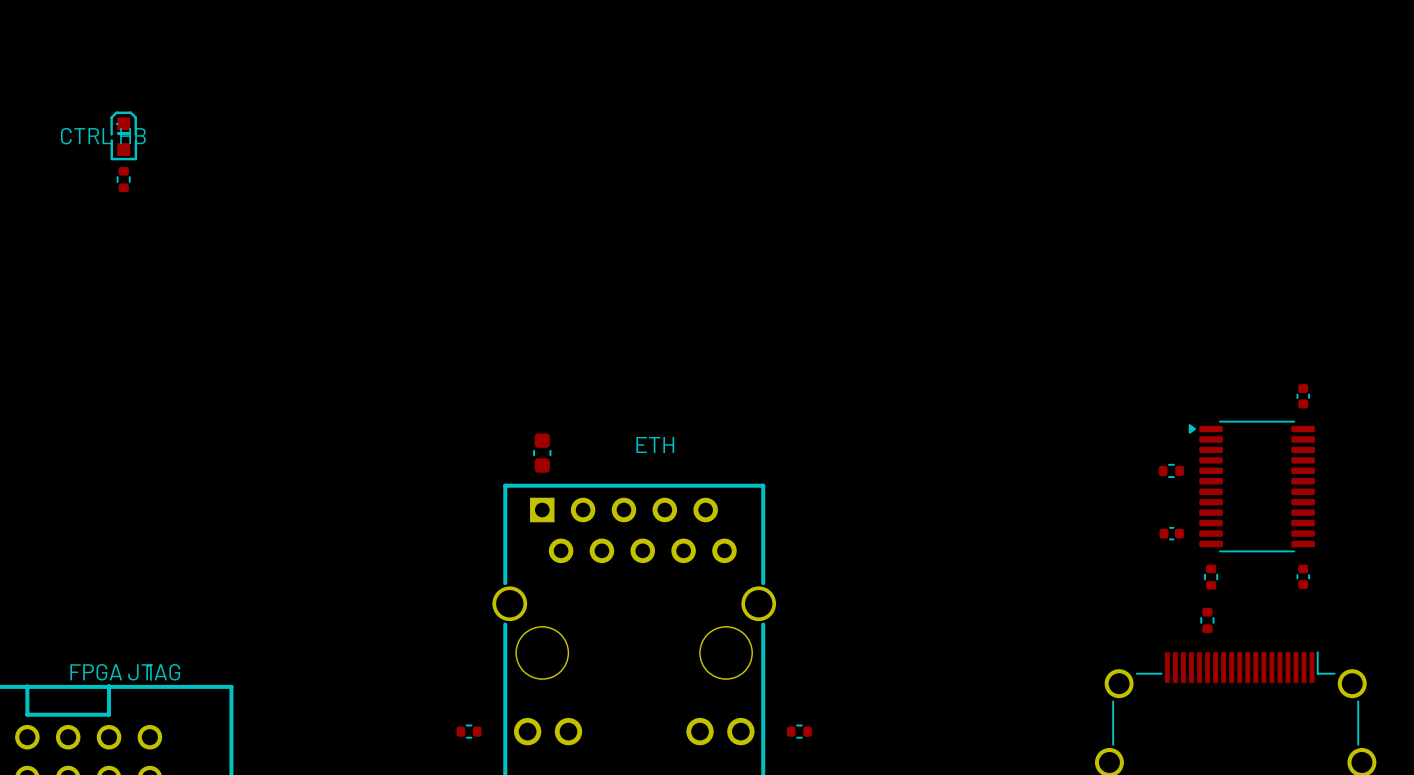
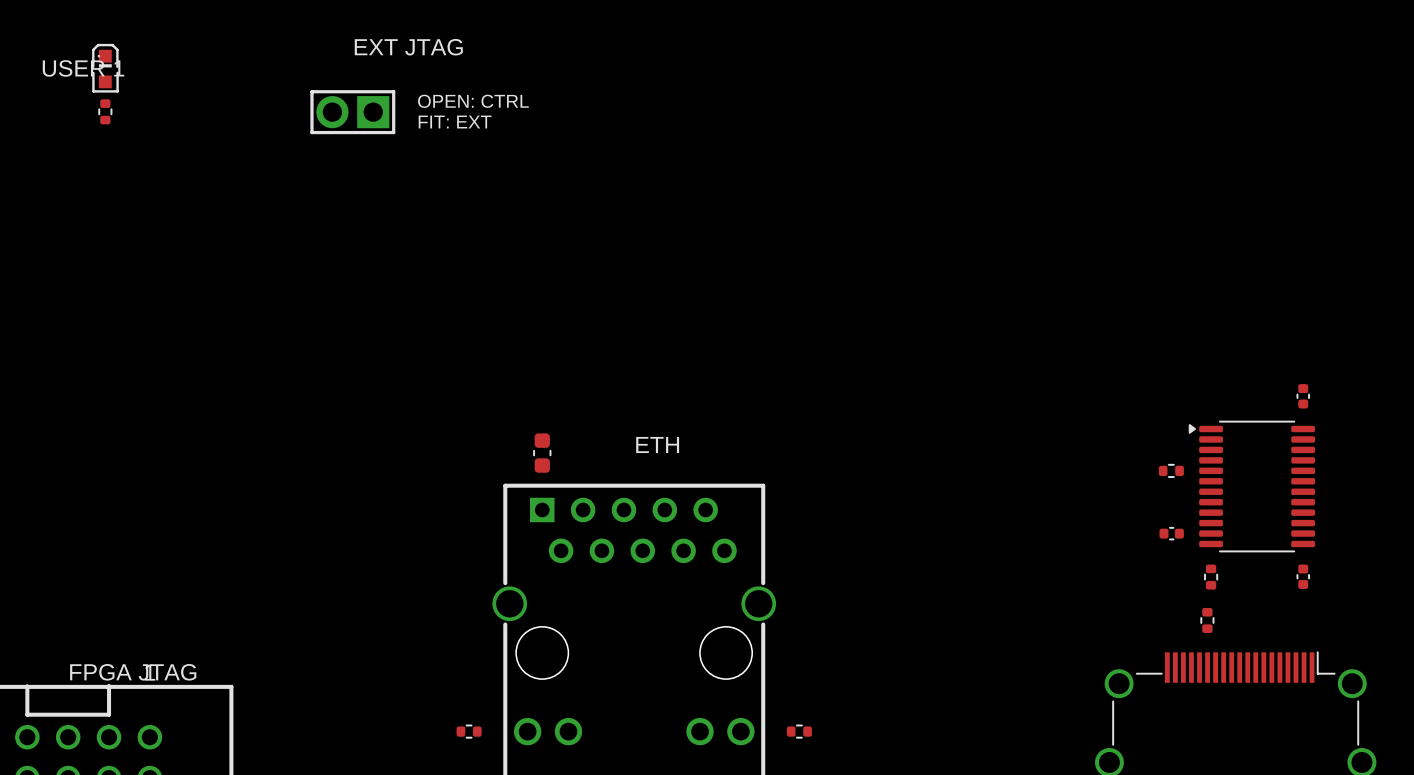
part: none -> (105, 68)
part: none -> (352, 112)
part: (123, 135) -> none
part position: (123, 179) -> (105, 111)

